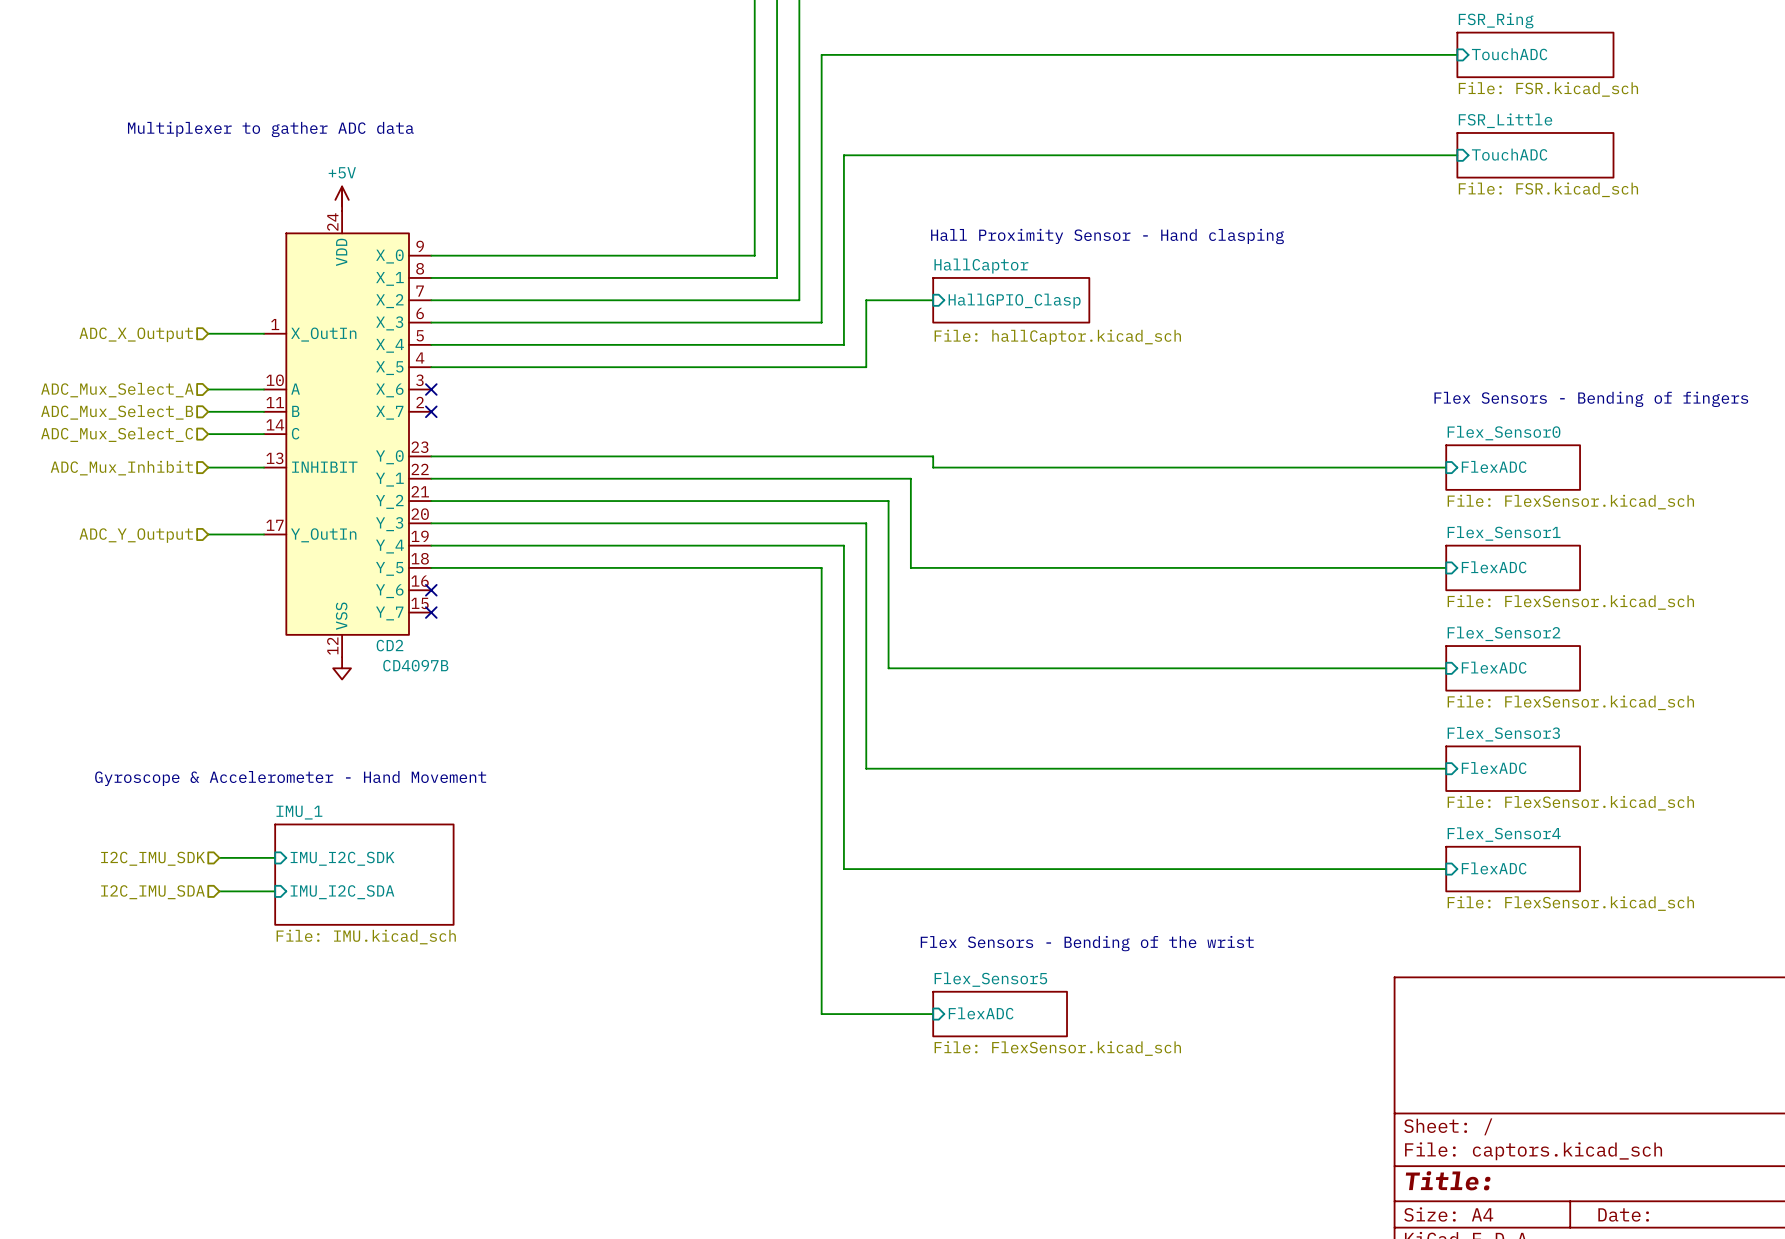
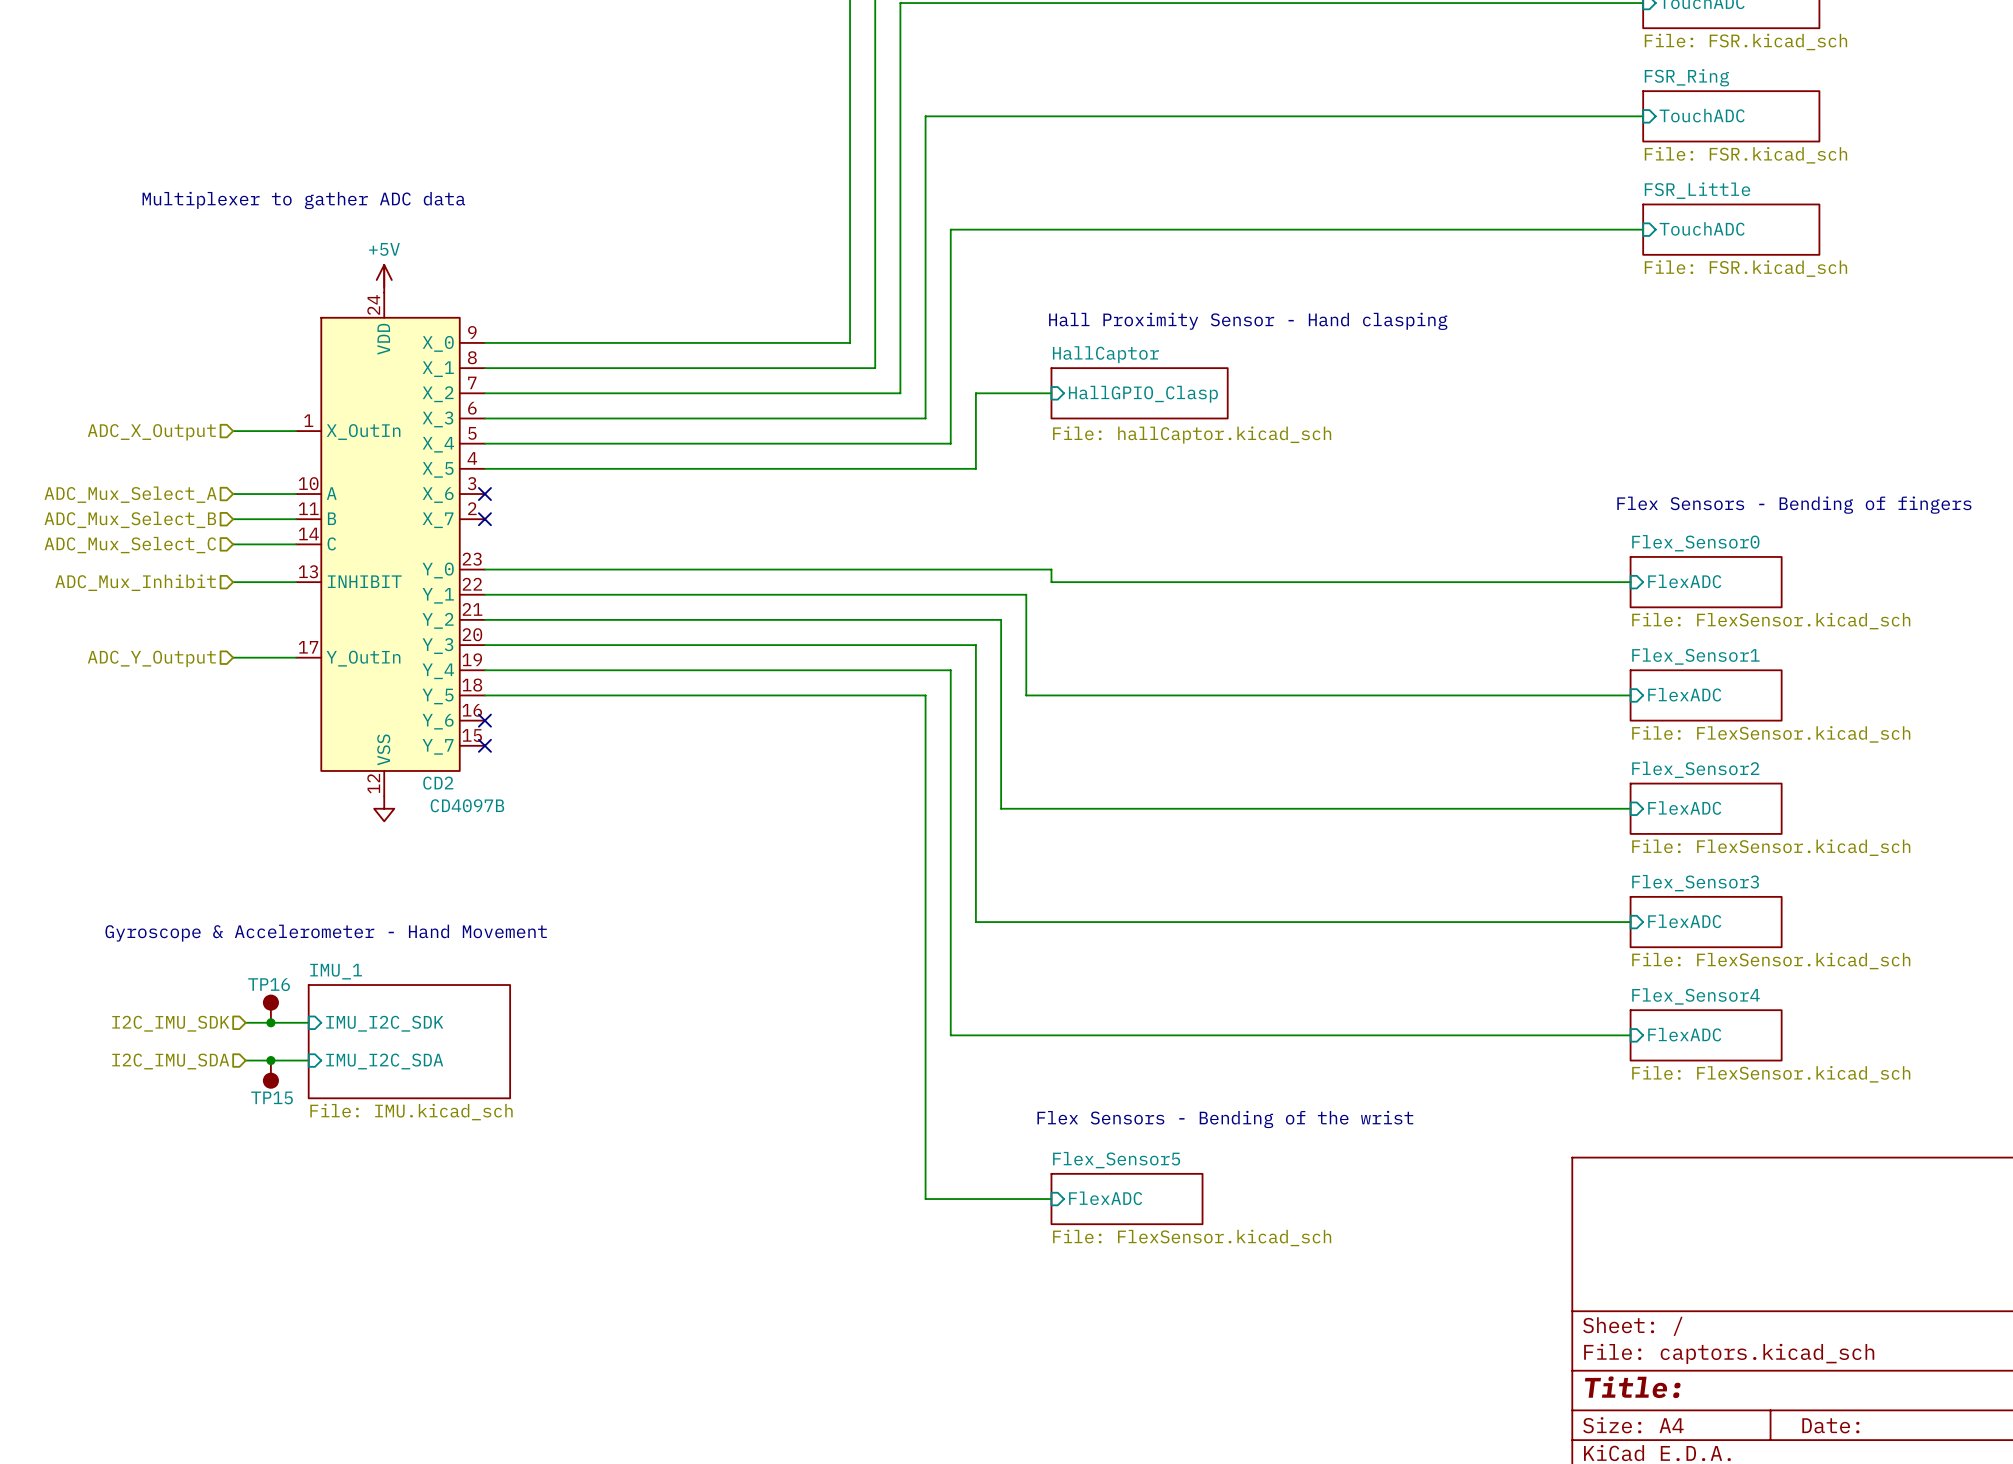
TP16: none -> (270, 1009)
junction: none -> (270, 1022)
junction: none -> (270, 1060)
TP15: none -> (270, 1074)

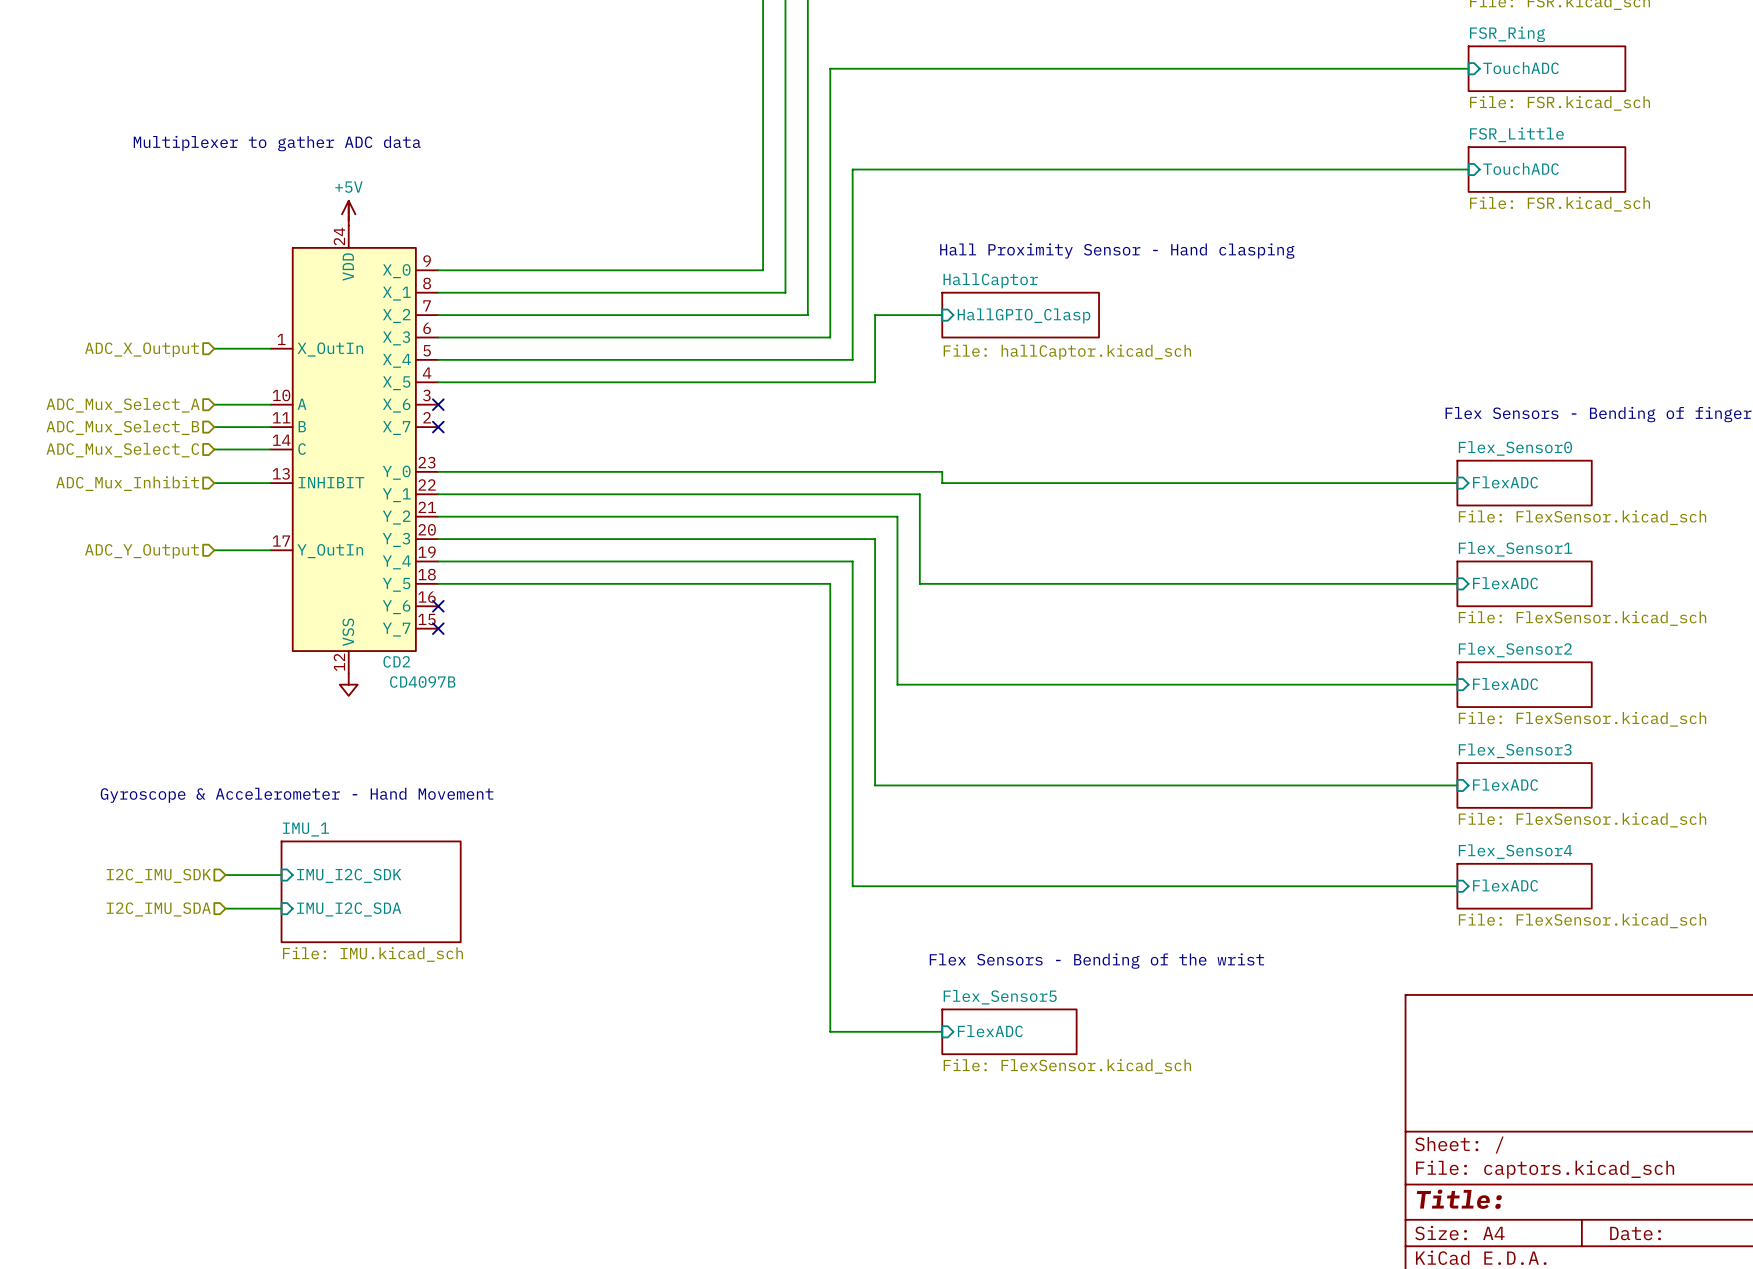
TP16: (270, 1009) -> none
junction: (270, 1022) -> none
junction: (270, 1060) -> none
TP15: (270, 1074) -> none

